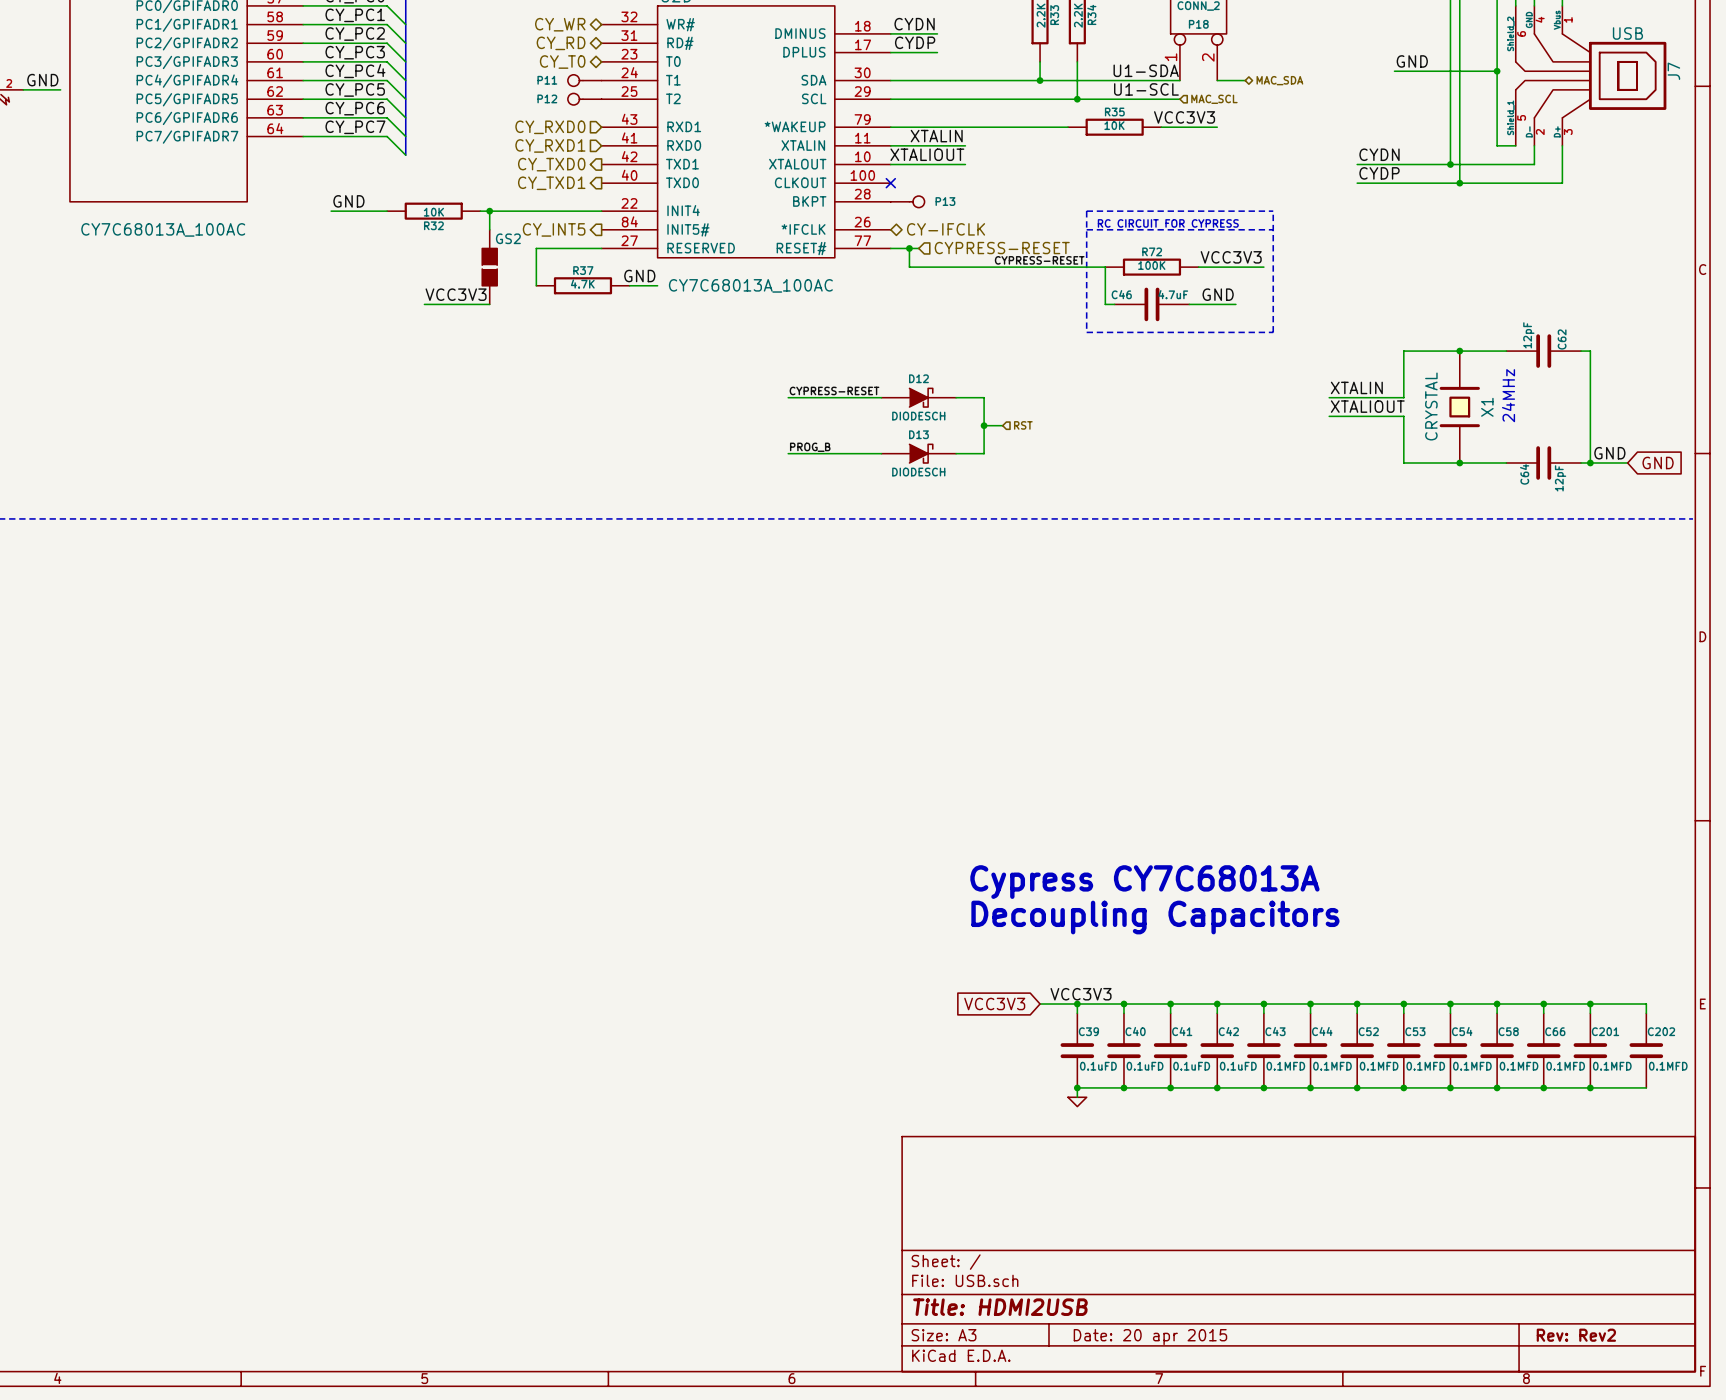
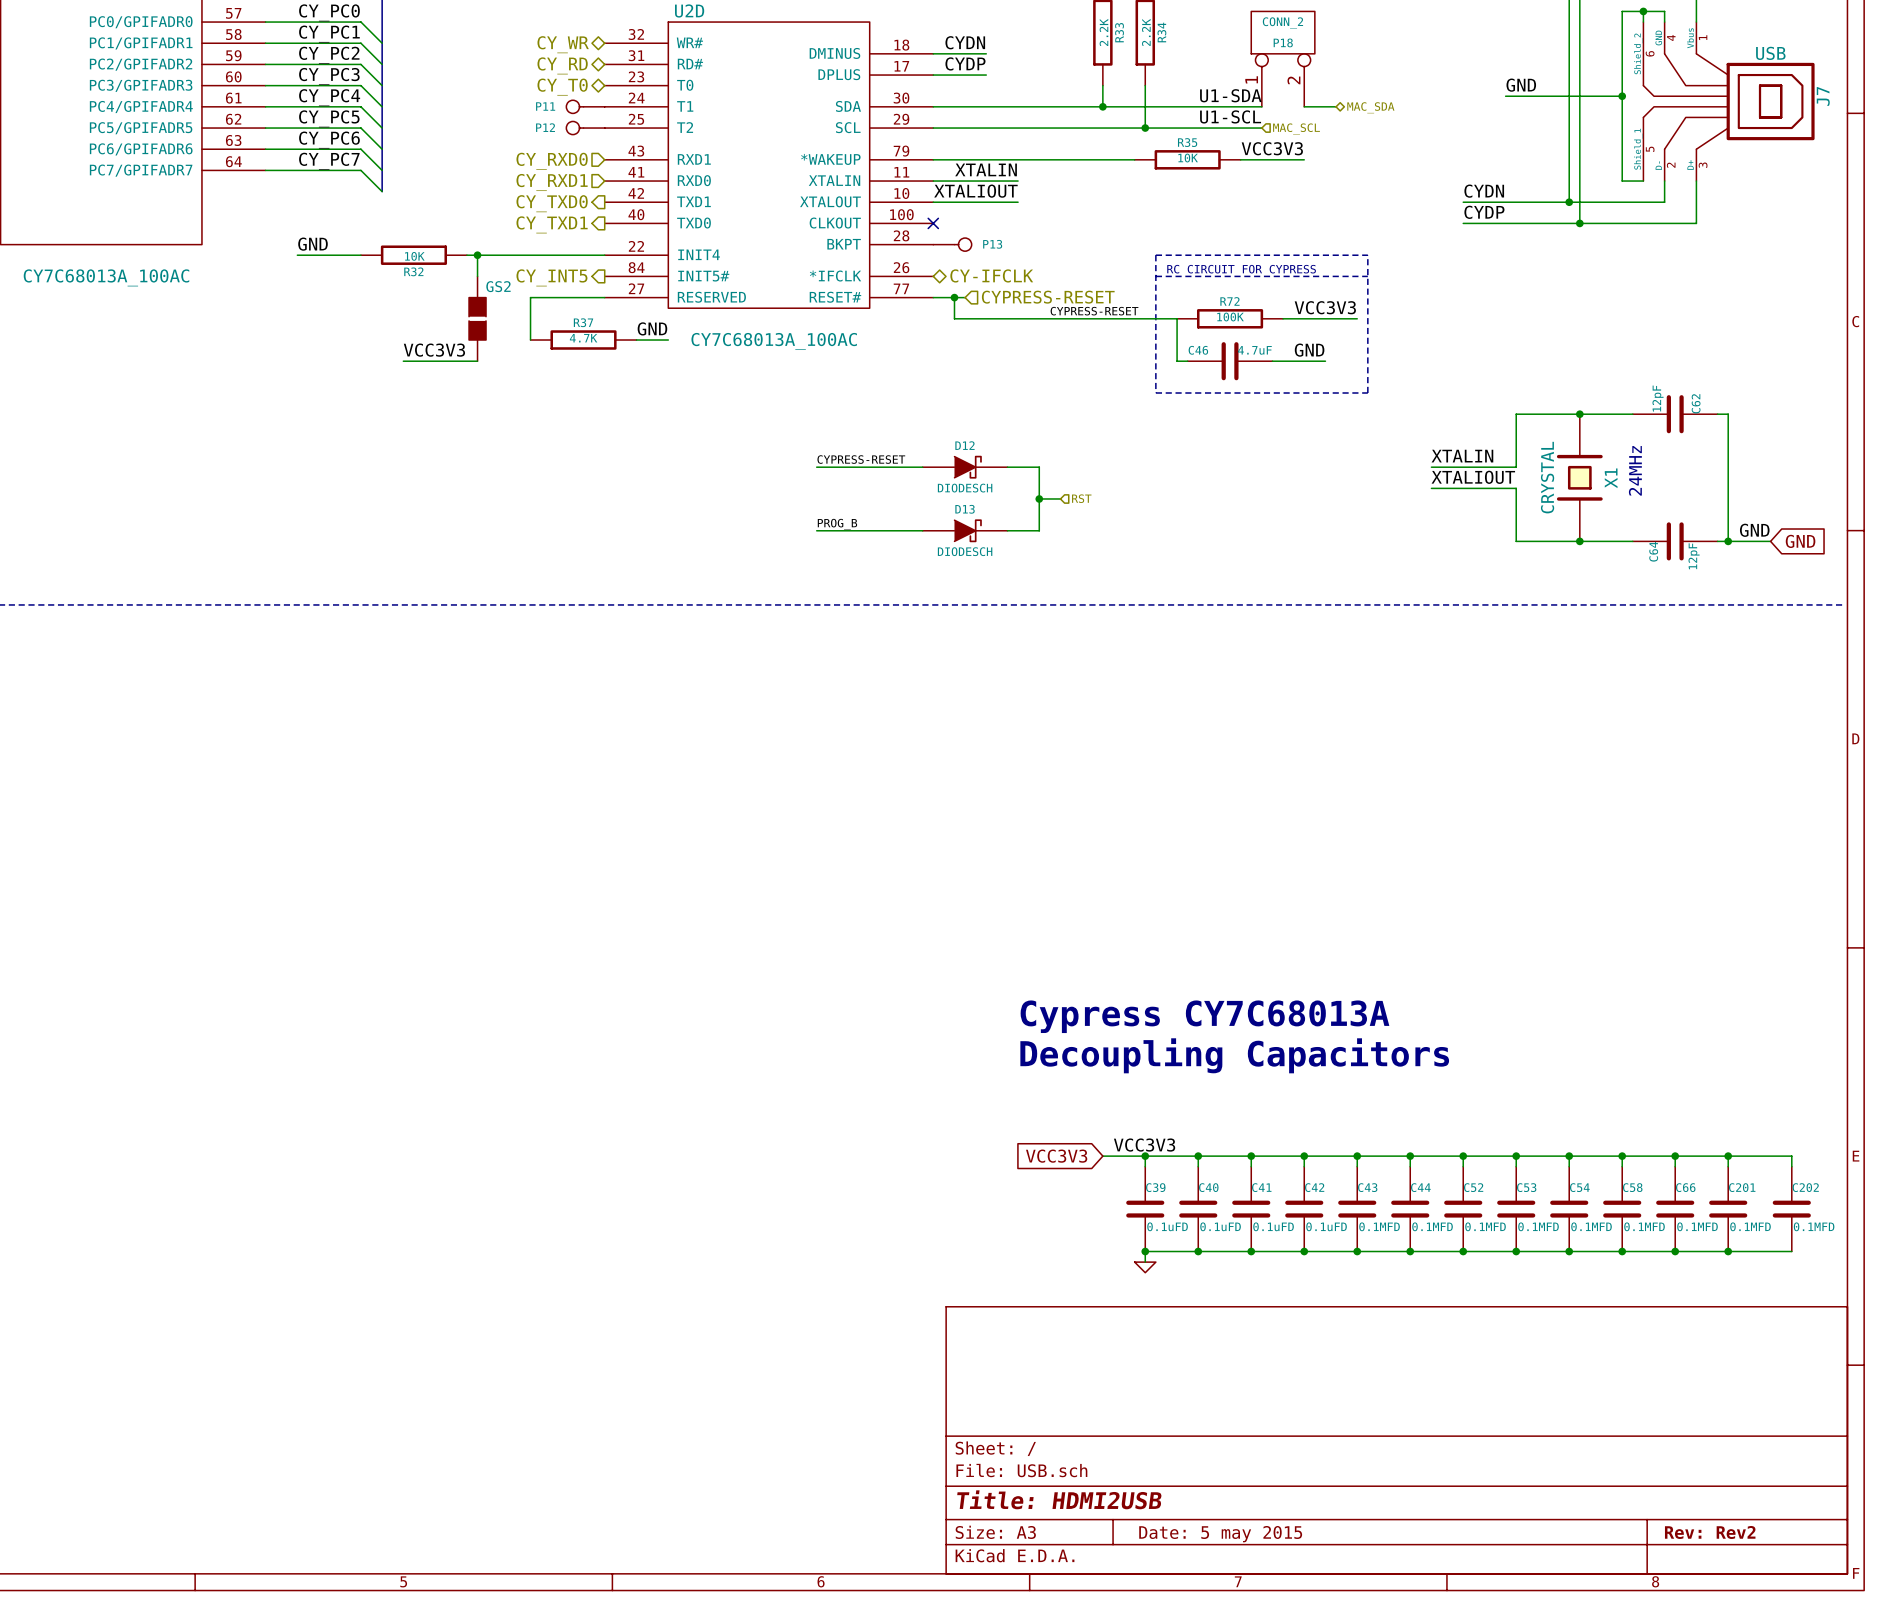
title block: Date: 20 apr 2015 (1150, 1337) -> Date: 5 may 2015 (1220, 1534)

